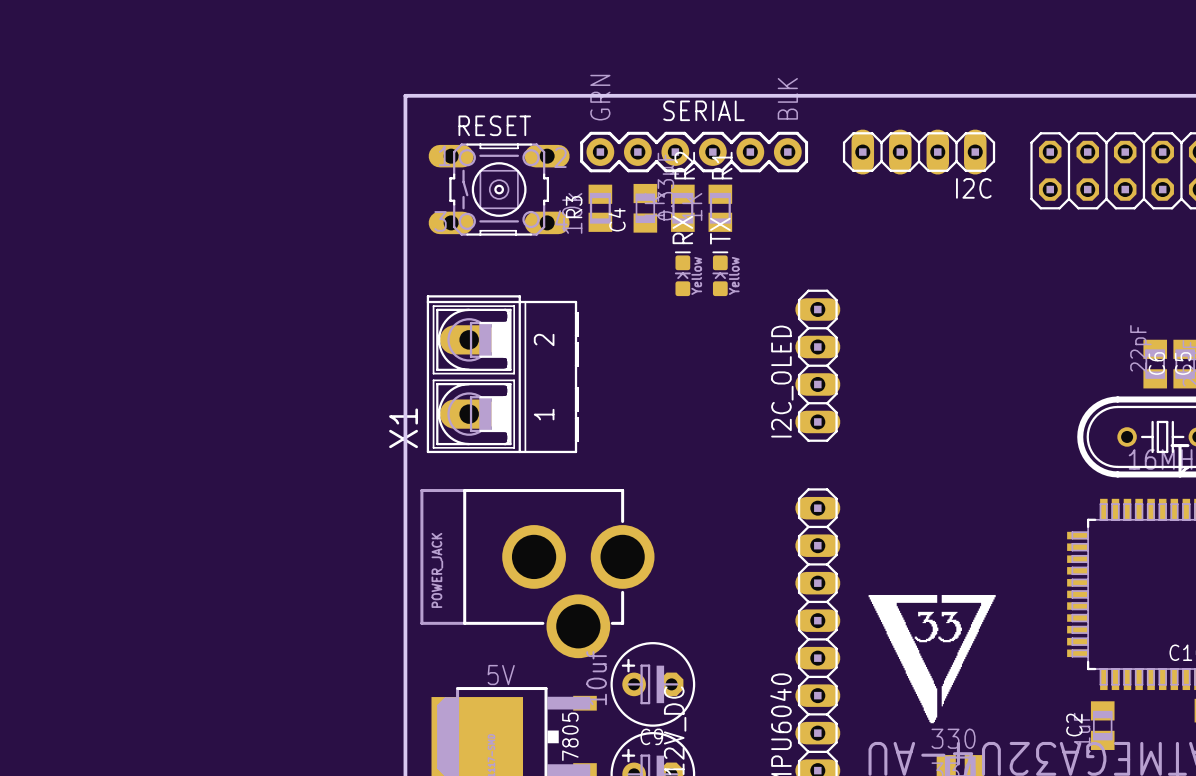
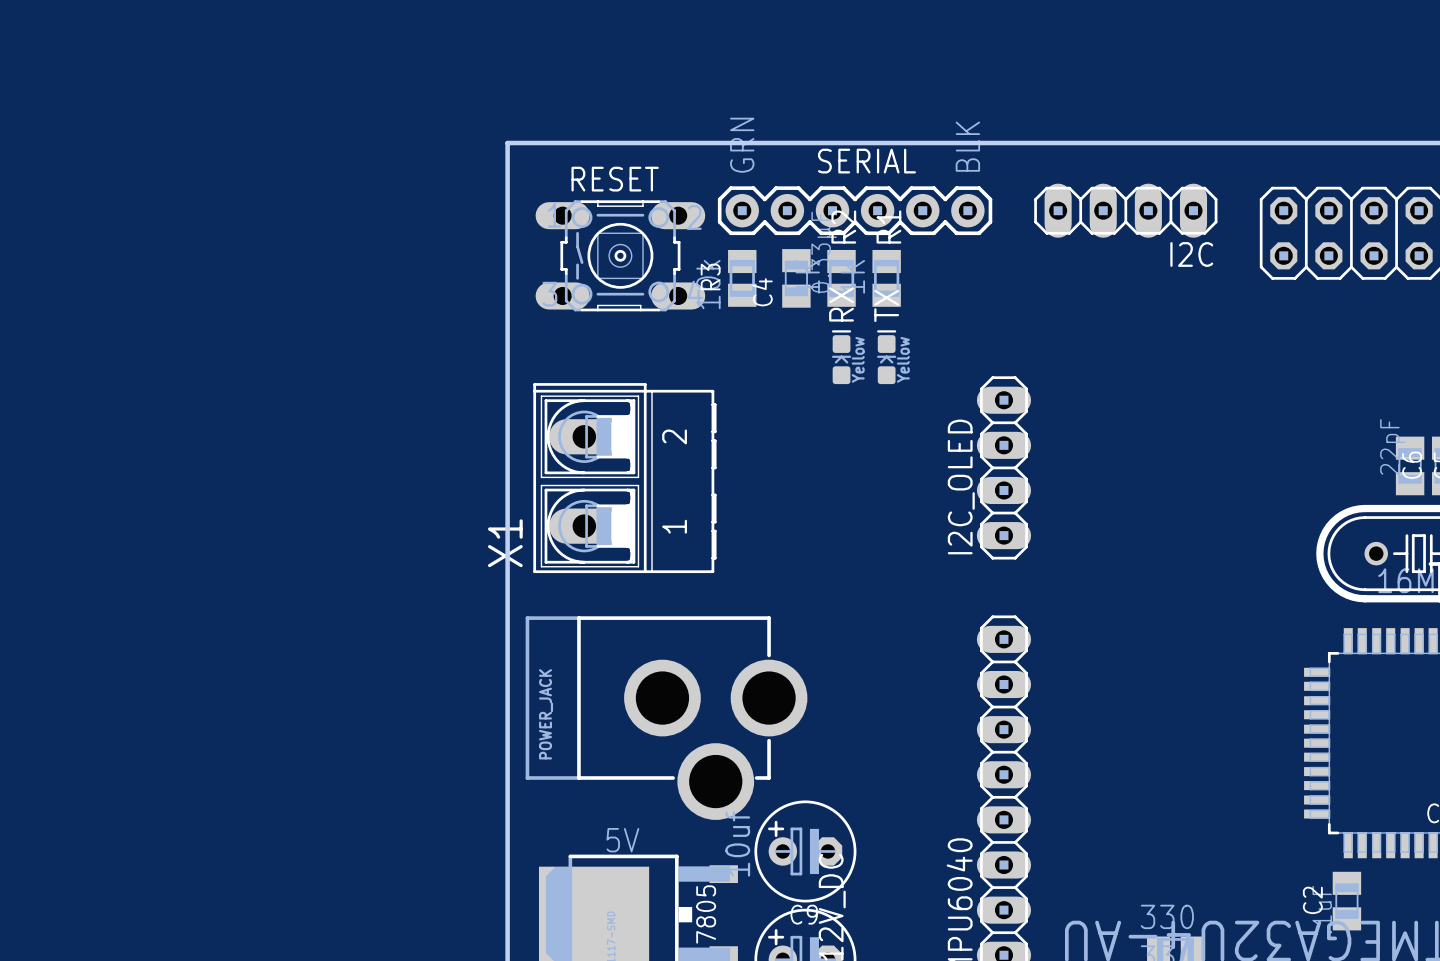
drawing: [868, 594, 996, 724] -> none

